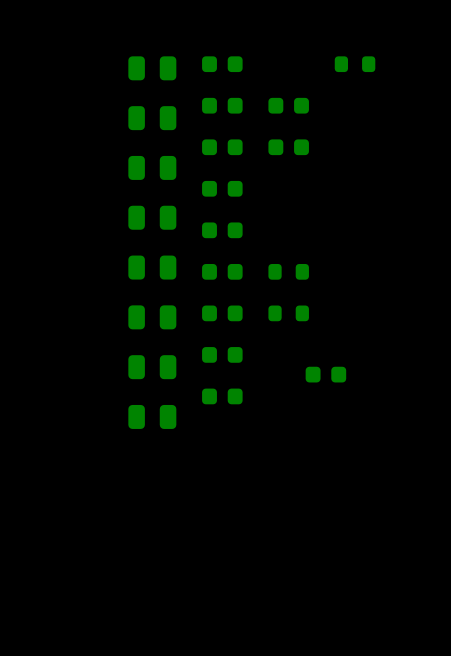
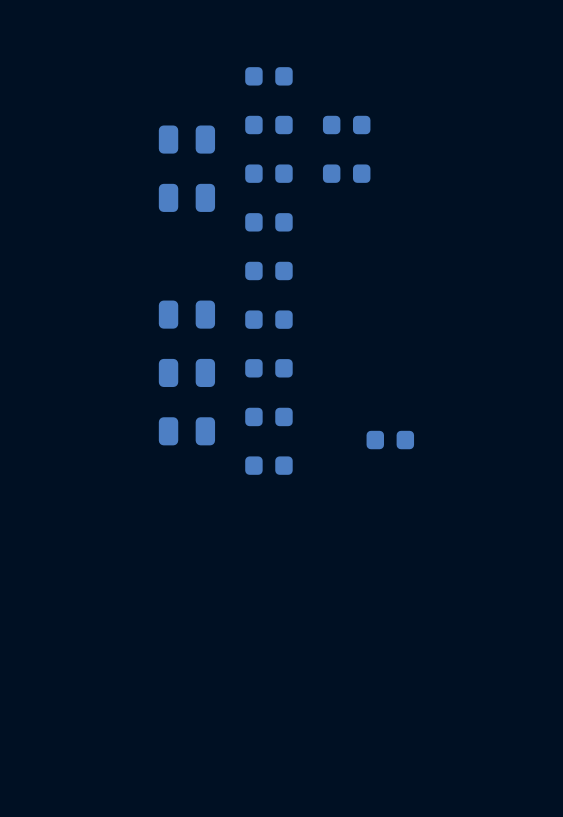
part: (355, 64) -> none
part: (152, 68) -> none
part: (152, 217) -> none
part: (288, 271) -> none
part: (288, 313) -> none
part: (152, 416) -> none

